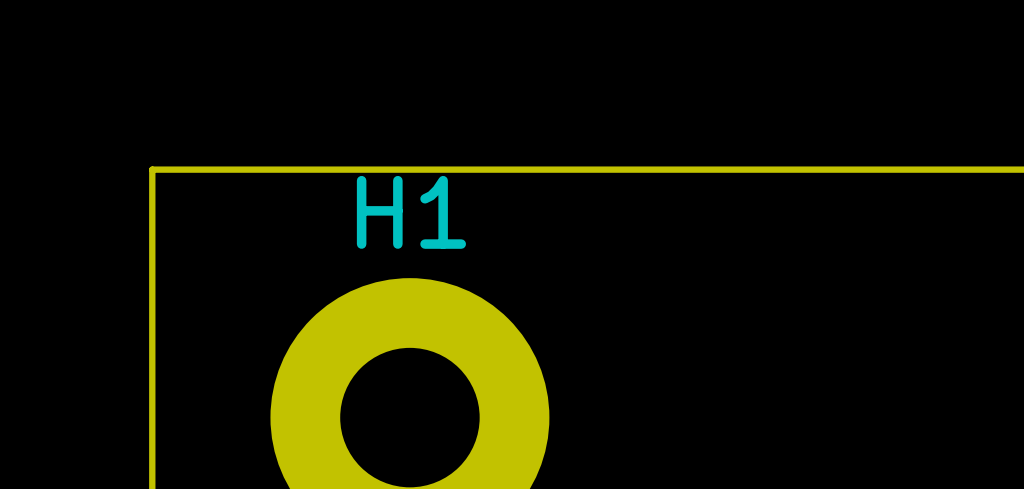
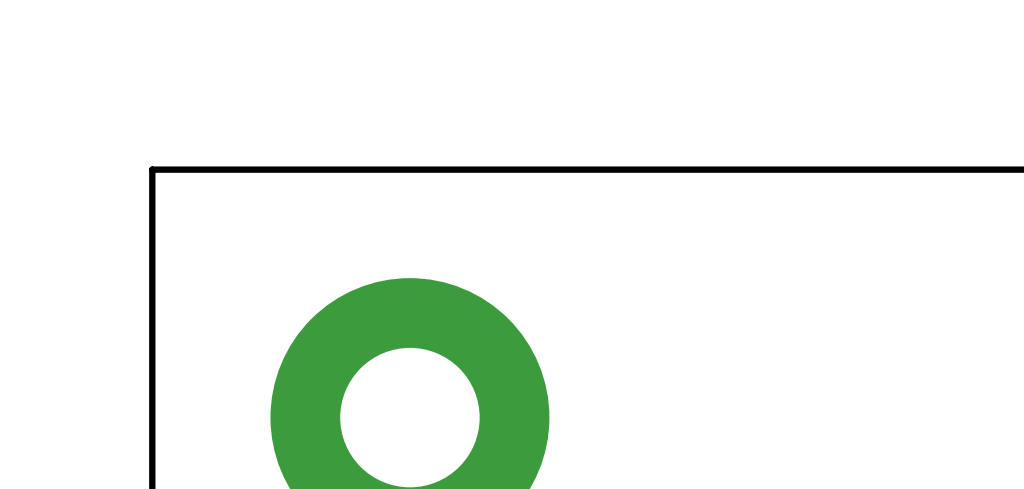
H1 name: H1 (411, 212) -> none

